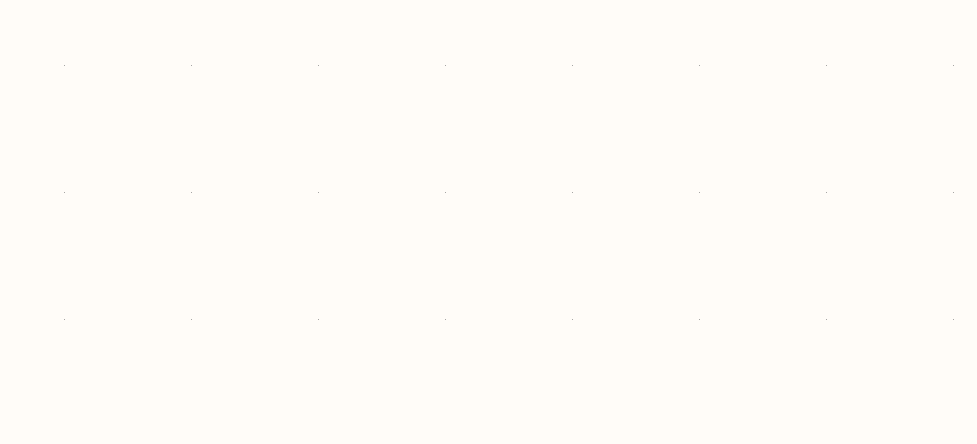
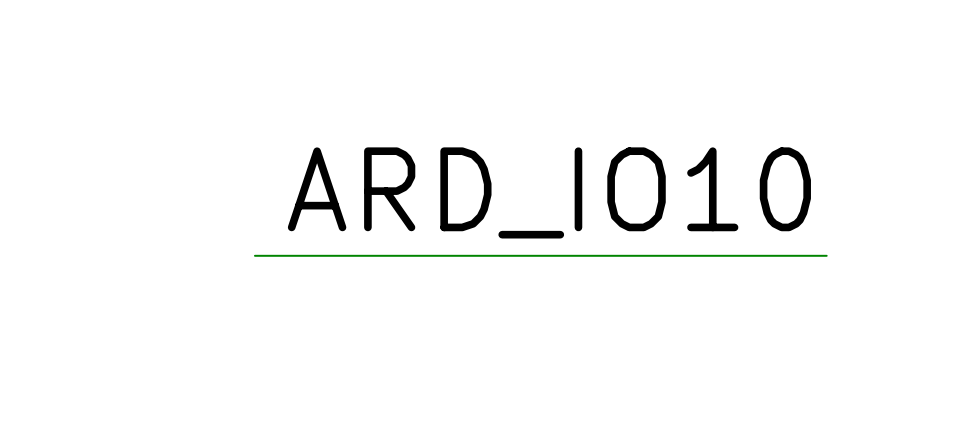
label: none -> ARD_IO10 (549, 192)
wire: none -> (254, 255) (826, 255)

